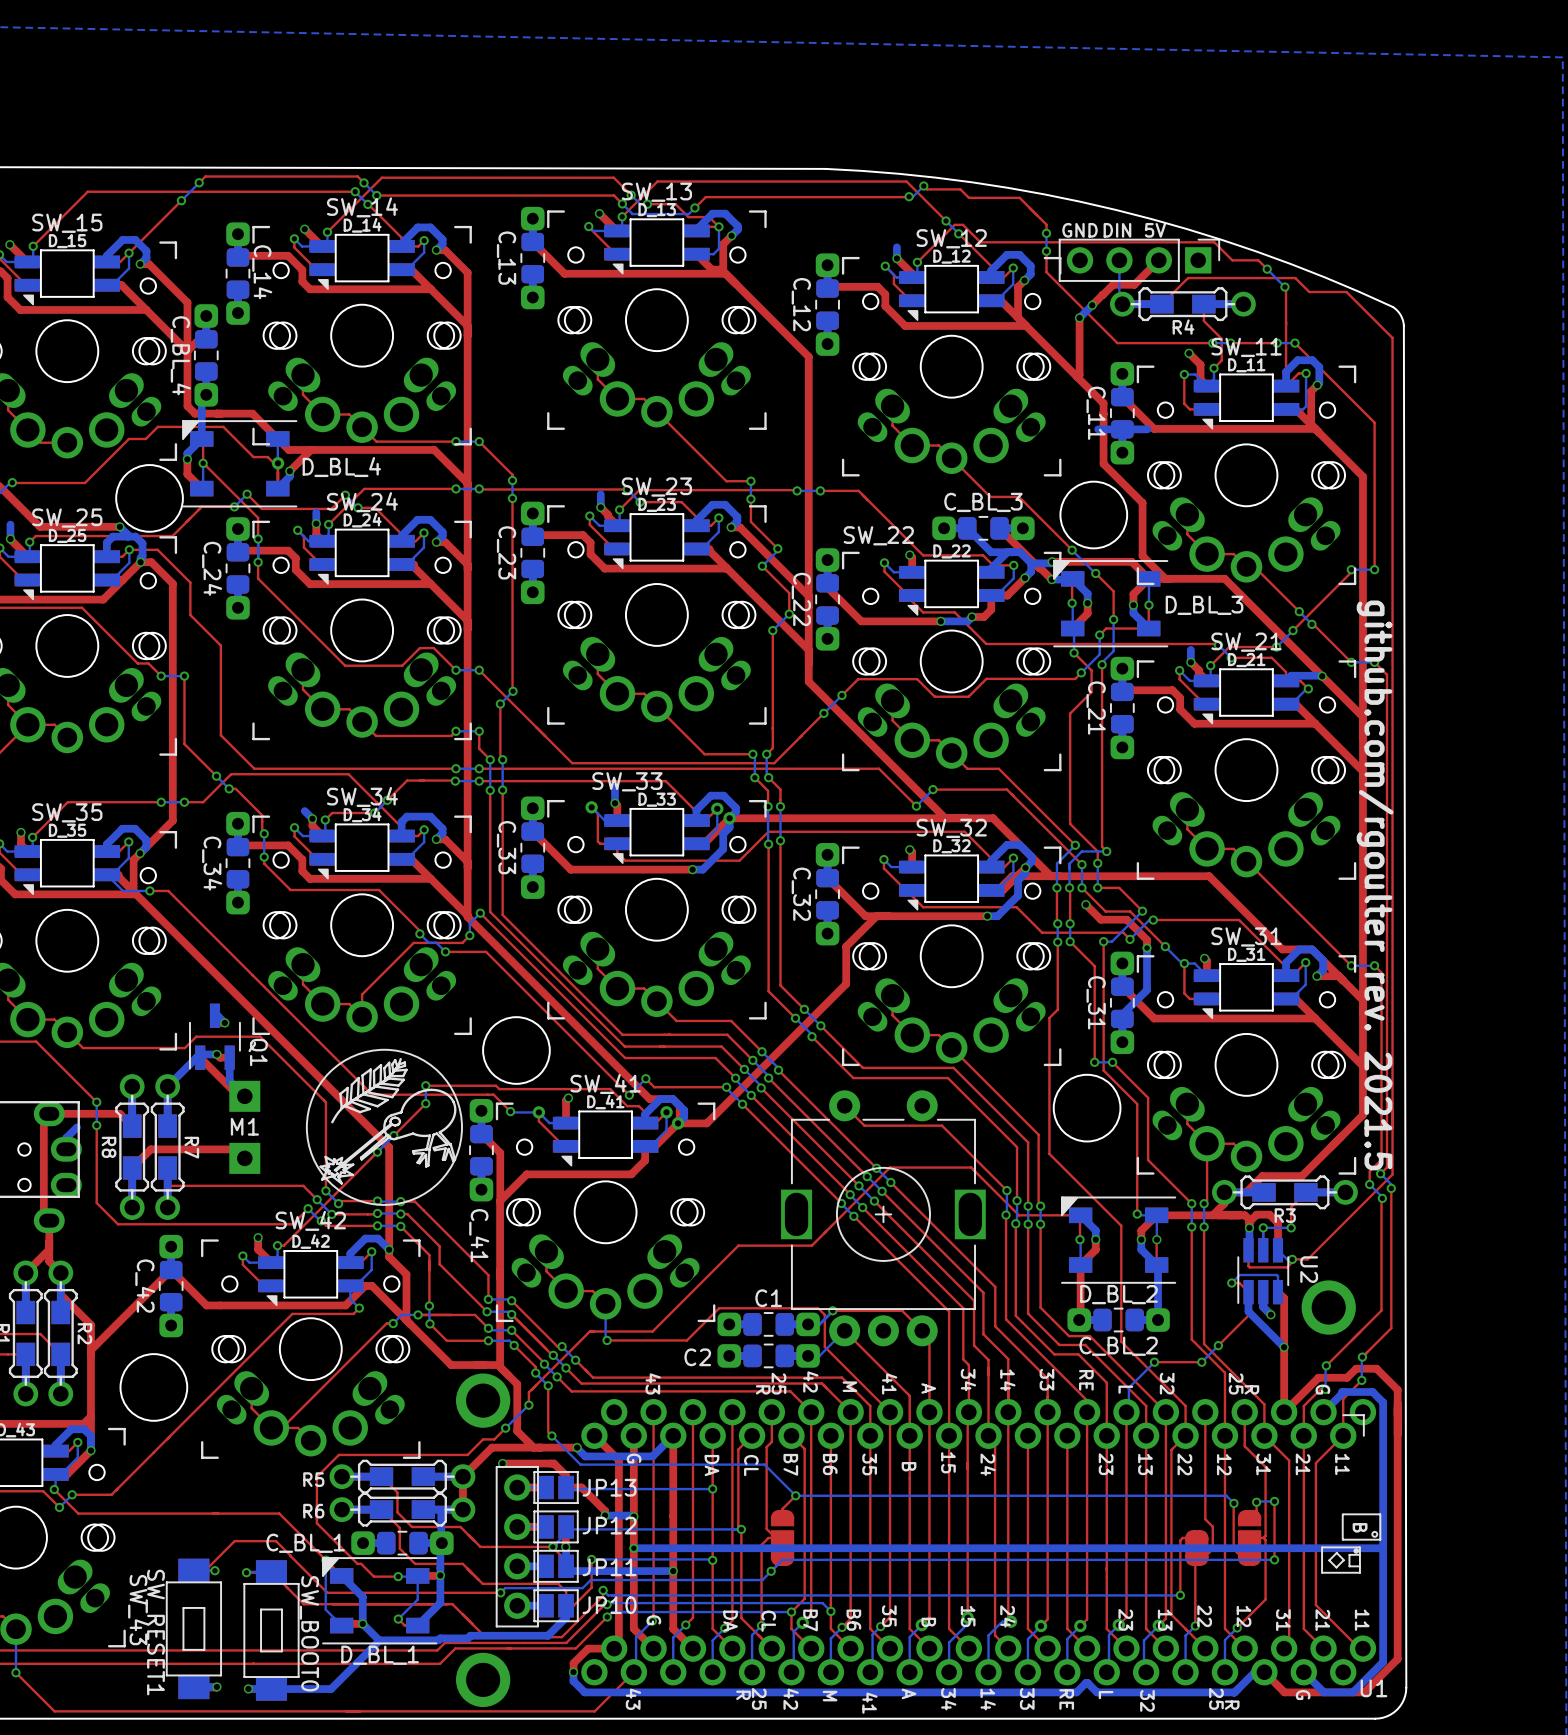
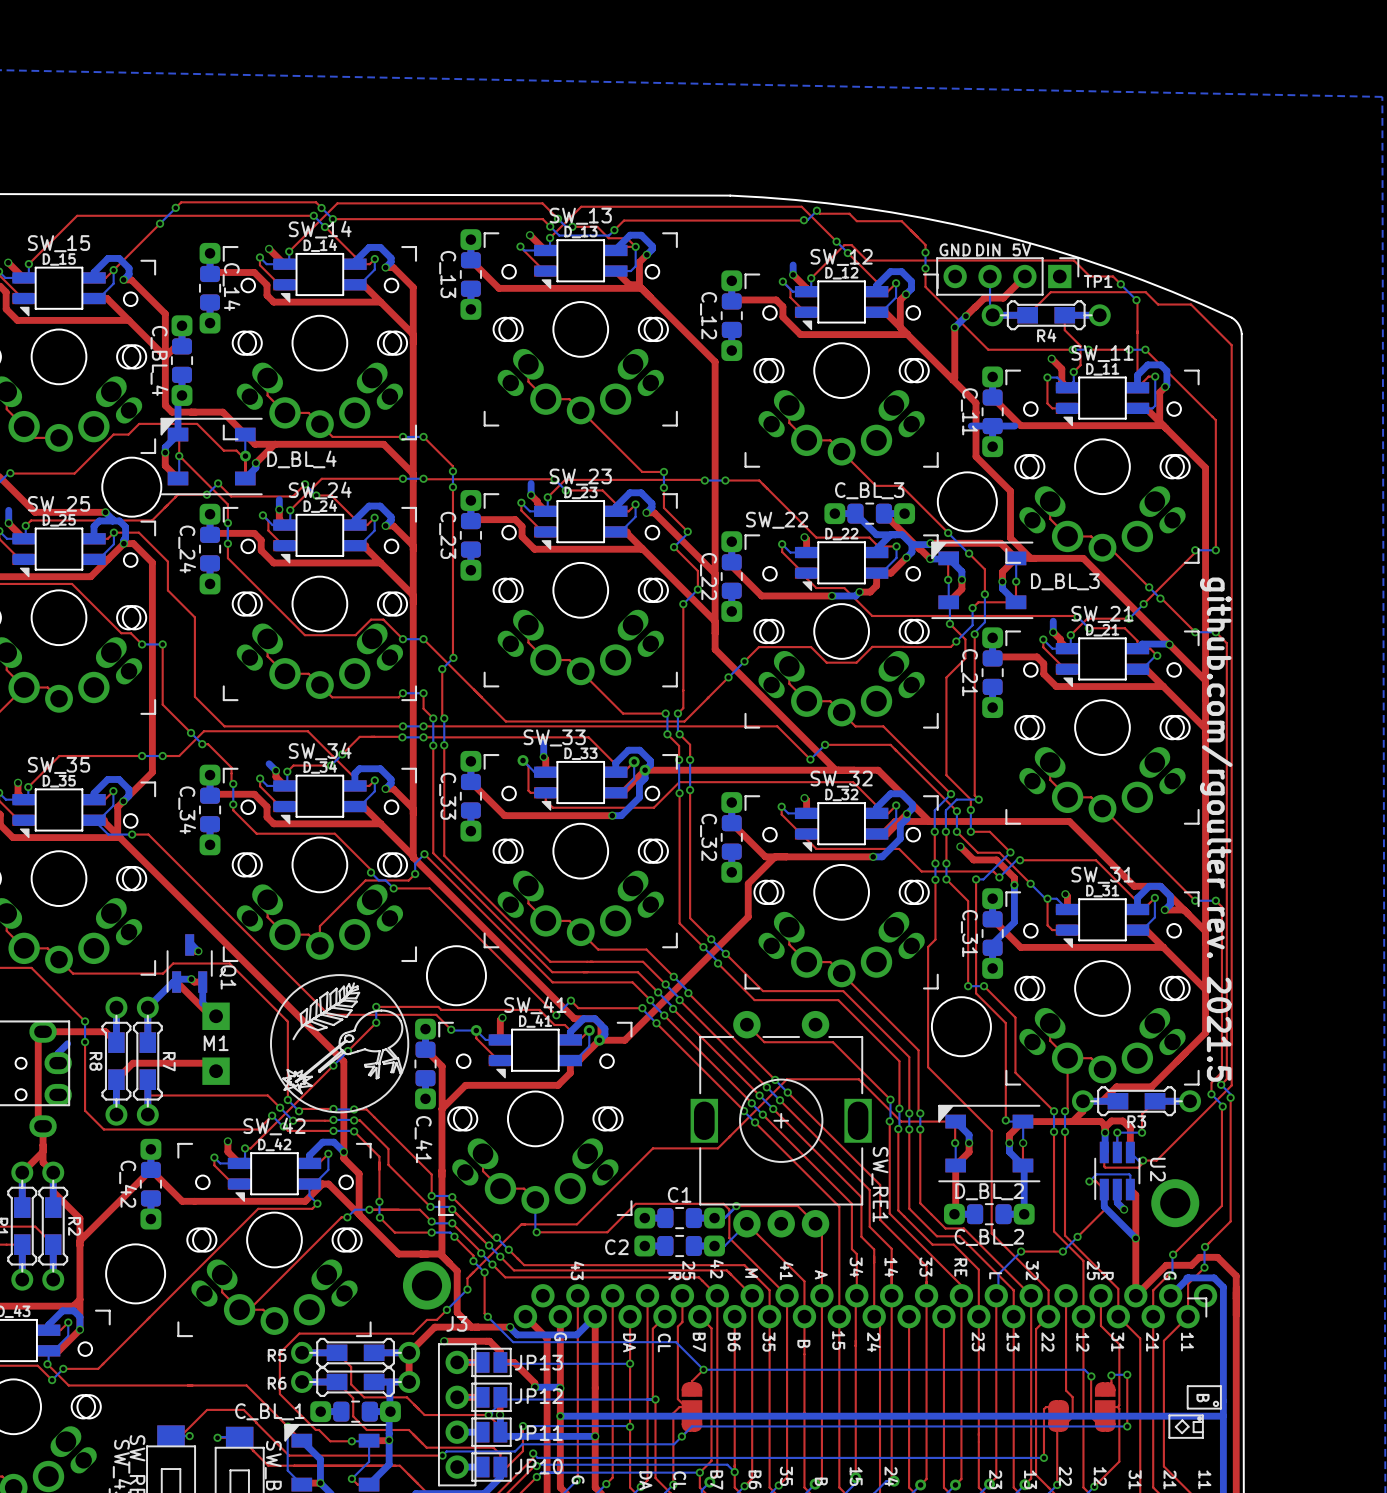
TP1 name: none -> TP1 (1098, 281)
SW_RE1 name: none -> SW_RE1 (879, 1184)
J3 name: none -> J3 (456, 1323)

